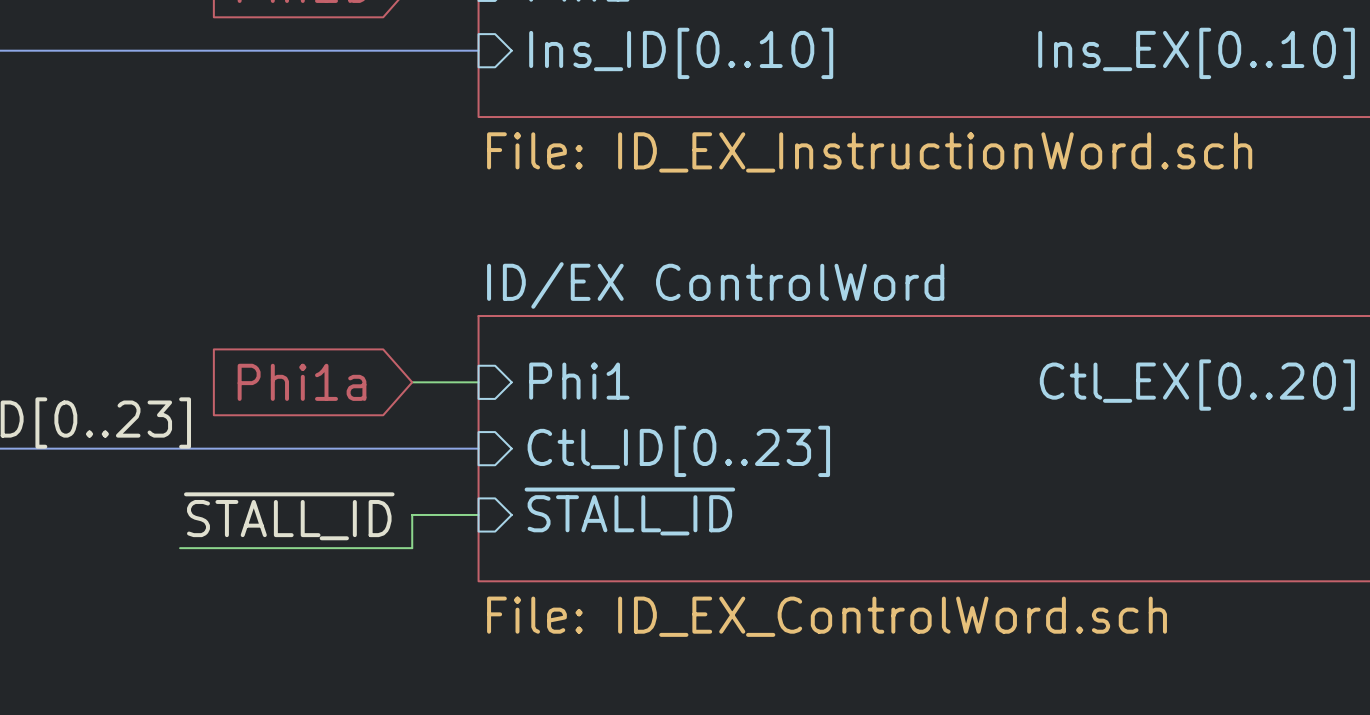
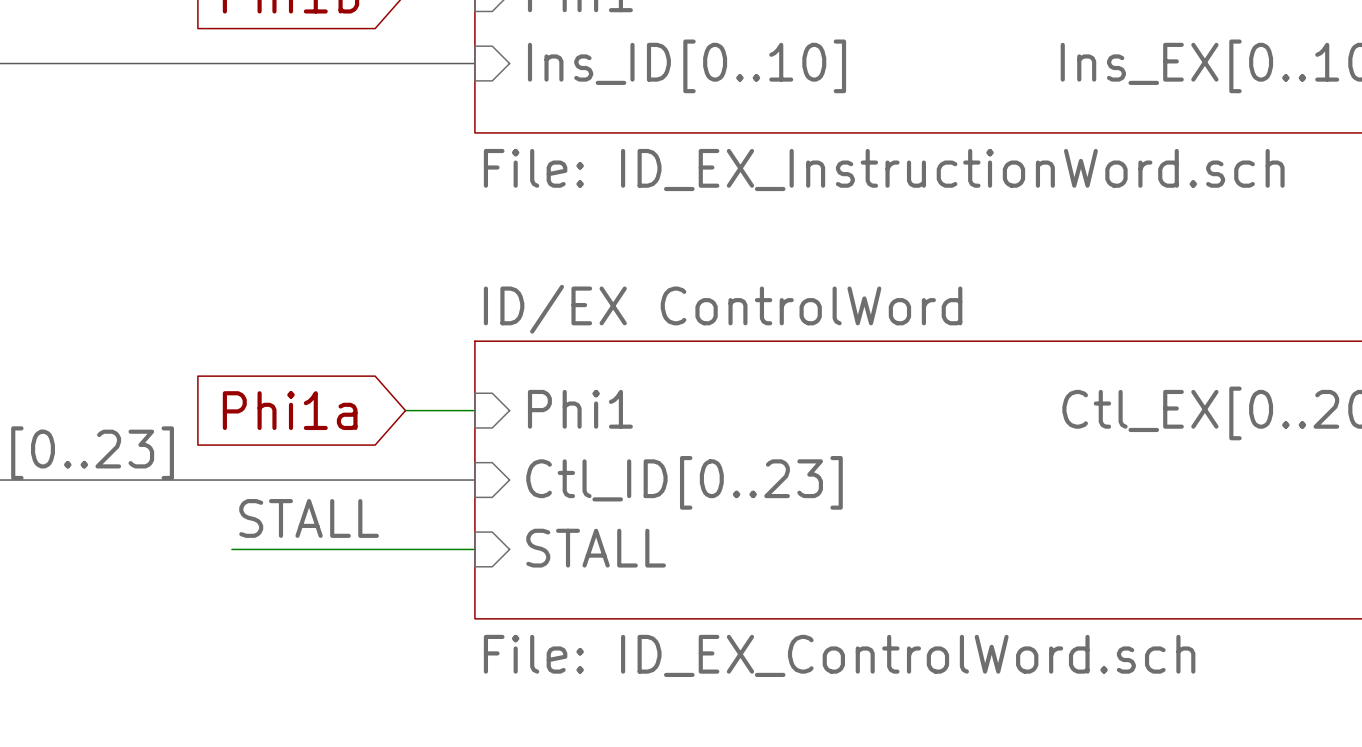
sheet pin: ~{STALL_ID} (629, 511) -> STALL (596, 548)
wire: (412, 514) (412, 548) (180, 548) -> (405, 549) (231, 549)
label: ~{STALL_ID} (289, 516) -> STALL (309, 518)

